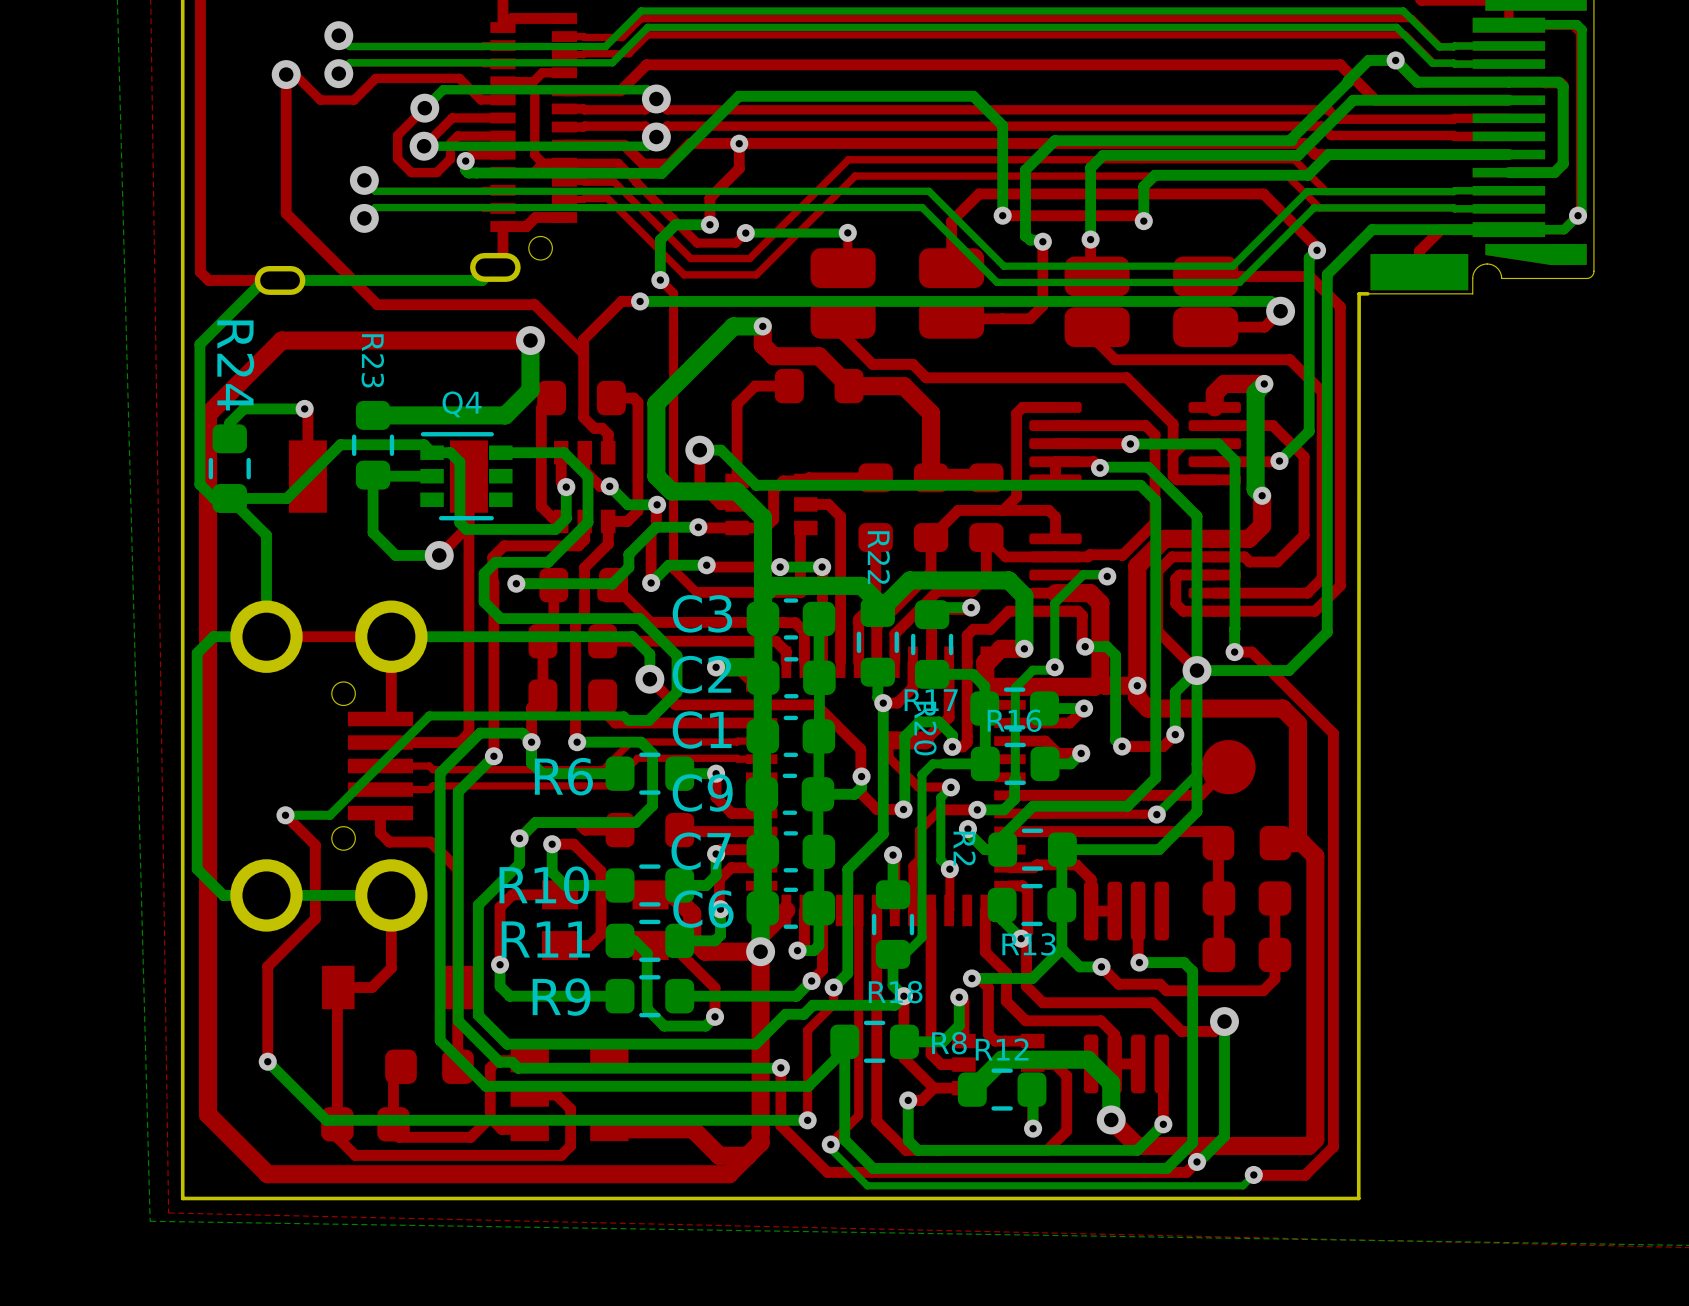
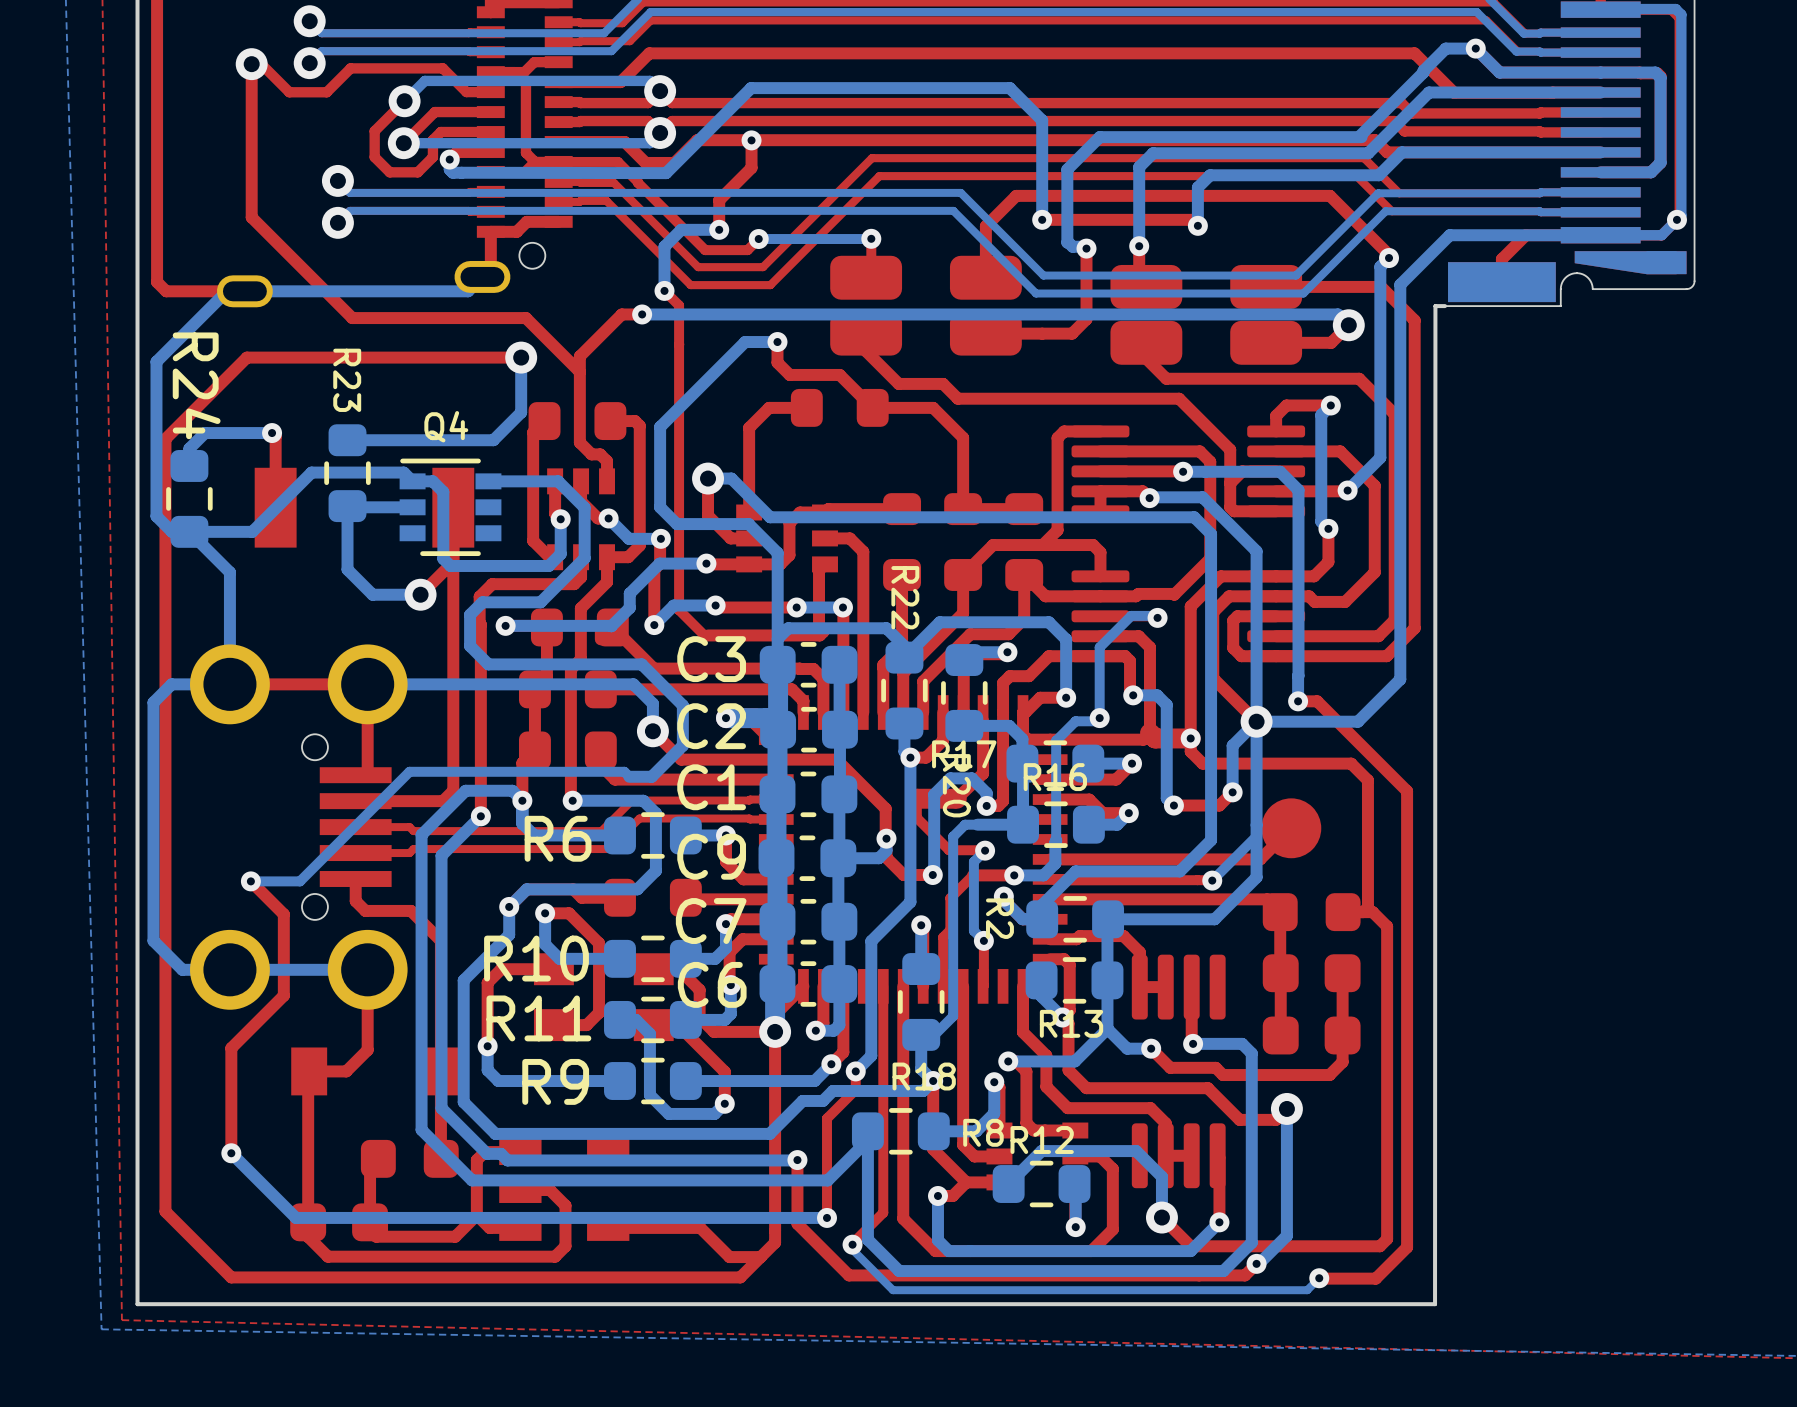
top track width: thick (762, 326) (762, 345) (773, 356) (819, 356) (849, 386) (903, 386) (931, 413) (931, 477) (986, 477) -> thin (777, 342) (777, 362) (789, 374) (839, 374) (872, 407) (933, 407) (963, 437) (963, 509) (1024, 509)
bottom track width: thick (762, 326) (733, 326) (656, 403) (656, 476) (671, 491) (736, 491) (762, 517) (762, 618) -> thin (777, 342) (745, 342) (660, 427) (660, 507) (676, 524) (748, 524) (777, 553) (777, 664)
top track width: thick (530, 340) (281, 340) (208, 414) (208, 1114) (267, 1174) (729, 1174) (760, 1142) (760, 936) (786, 910) -> thin (521, 357) (246, 357) (165, 439) (165, 1211) (231, 1277) (740, 1277) (775, 1242) (775, 1014) (803, 986)
bottom track width: thick (530, 340) (530, 390) (505, 415) (373, 415) -> thin (521, 357) (521, 412) (493, 440) (347, 440)
top track width: thick (1264, 383) (1224, 383) (1214, 393) (1214, 407) -> thin (1330, 405) (1286, 405) (1276, 415) (1276, 431)
bottom track width: thick (1264, 383) (1255, 392) (1255, 489) (1262, 495) -> thin (1330, 405) (1321, 415) (1321, 521) (1328, 528)
top track width: thick (1262, 495) (1262, 525) (1249, 538) (1164, 538) (1137, 566) (1137, 697) (1148, 708) (1282, 708) (1297, 723) (1297, 838) (1293, 843) -> thin (1328, 528) (1328, 562) (1314, 576) (1220, 576) (1190, 606) (1190, 751) (1202, 763) (1351, 763) (1367, 780) (1367, 907) (1363, 912)
top track width: thick (1055, 593) (1090, 593) (1100, 603) (1100, 680) (1094, 686) (989, 686) (985, 682) (985, 662) (1000, 648) (1024, 648) -> thin (1100, 636) (1138, 636) (1149, 647) (1149, 733) (1143, 739) (1027, 739) (1023, 734) (1023, 712) (1025, 712) (1040, 697) (1066, 697)
bottom track width: thick (762, 595) (772, 585) (861, 585) (877, 602) (877, 612) (909, 580) (1008, 580) (1024, 596) (1024, 648) -> thin (777, 638) (788, 628) (886, 628) (904, 646) (904, 657) (939, 622) (1048, 622) (1066, 639) (1066, 697)
top track width: thick (1275, 843) (1302, 843) (1315, 856) (1315, 1139) (1308, 1146) (1137, 1146) (1111, 1119) -> thin (1343, 912) (1372, 912) (1387, 926) (1387, 1239) (1379, 1246) (1190, 1246) (1161, 1217)
top track width: thick (650, 894) (673, 894) (692, 913) (692, 938) (705, 951) (760, 951) -> thin (653, 969) (678, 969) (699, 989) (699, 1017) (714, 1031) (775, 1031)
bottom track width: thick (972, 1089) (1002, 1059) (1087, 1059) (1111, 1083) (1111, 1119) -> thin (1008, 1184) (1041, 1151) (1136, 1151) (1161, 1176) (1161, 1217)
top track width: thick (609, 1129) (692, 1129) (719, 1155) (747, 1155) -> thin (608, 1227) (700, 1227) (729, 1257) (760, 1257)

